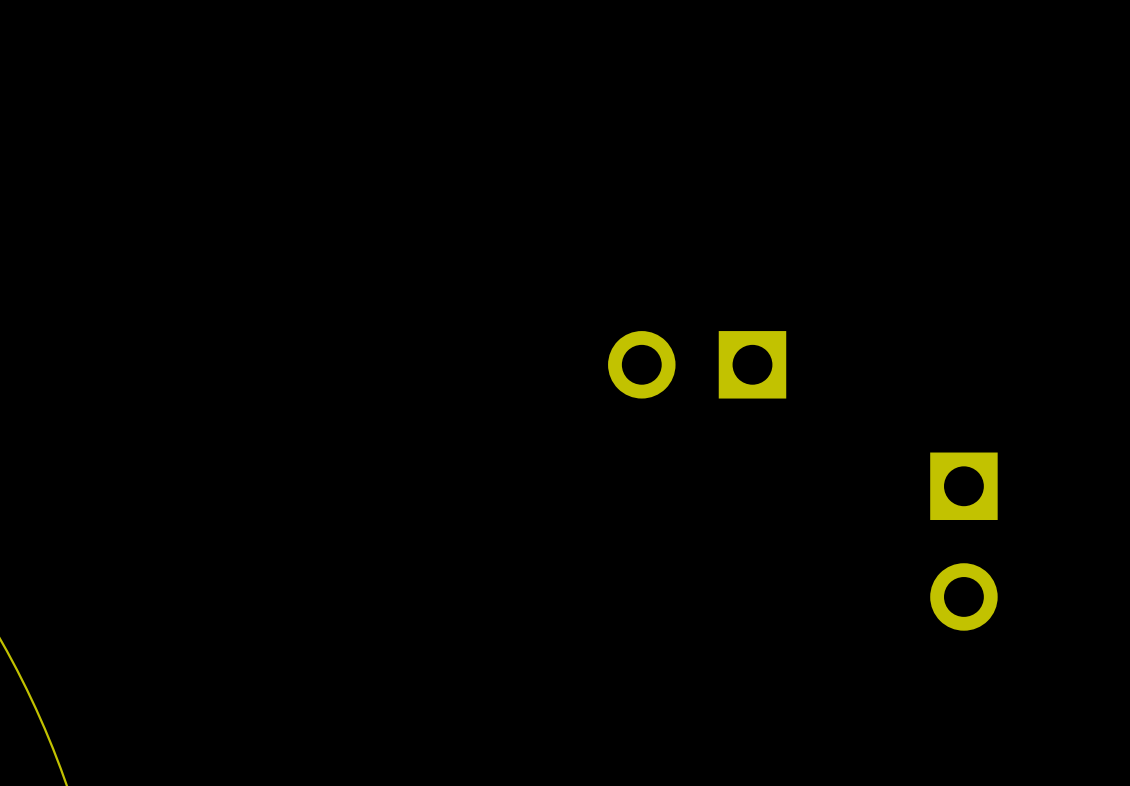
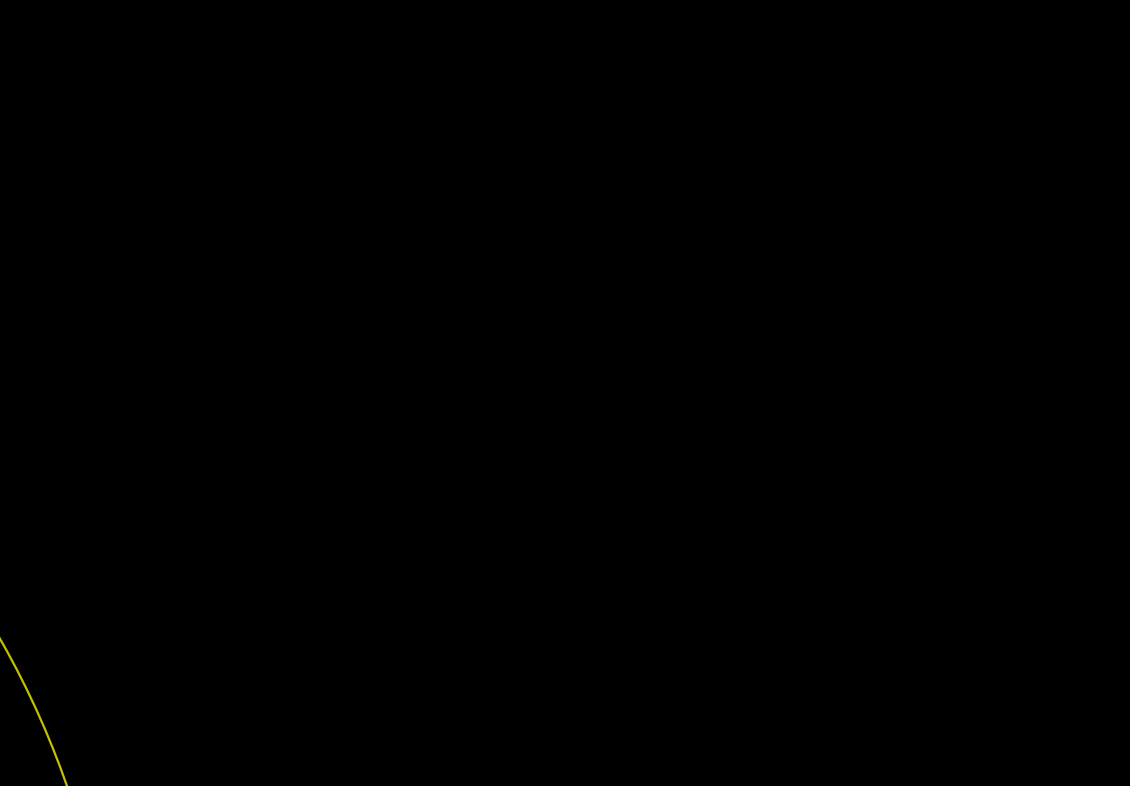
part: (697, 364) -> none
part: (963, 541) -> none

